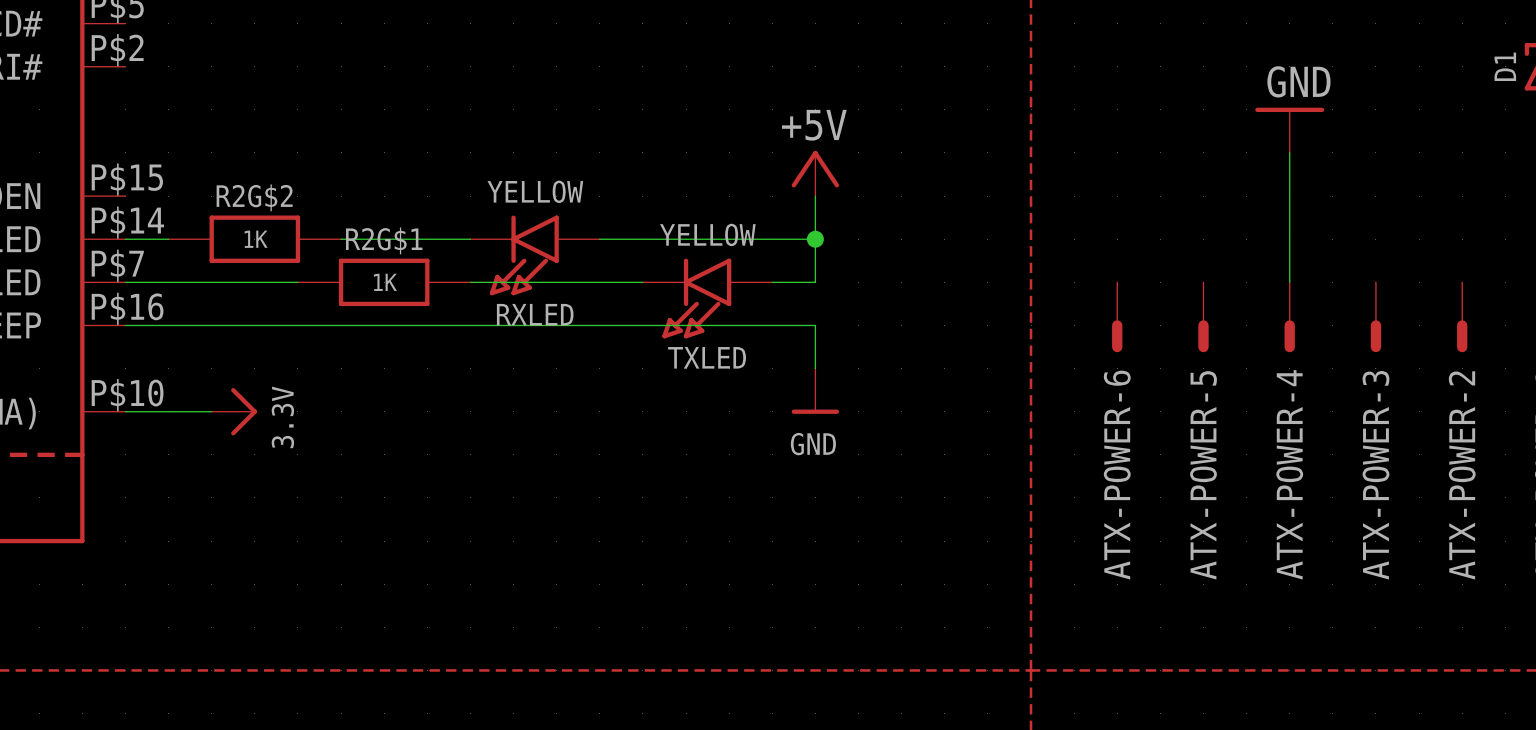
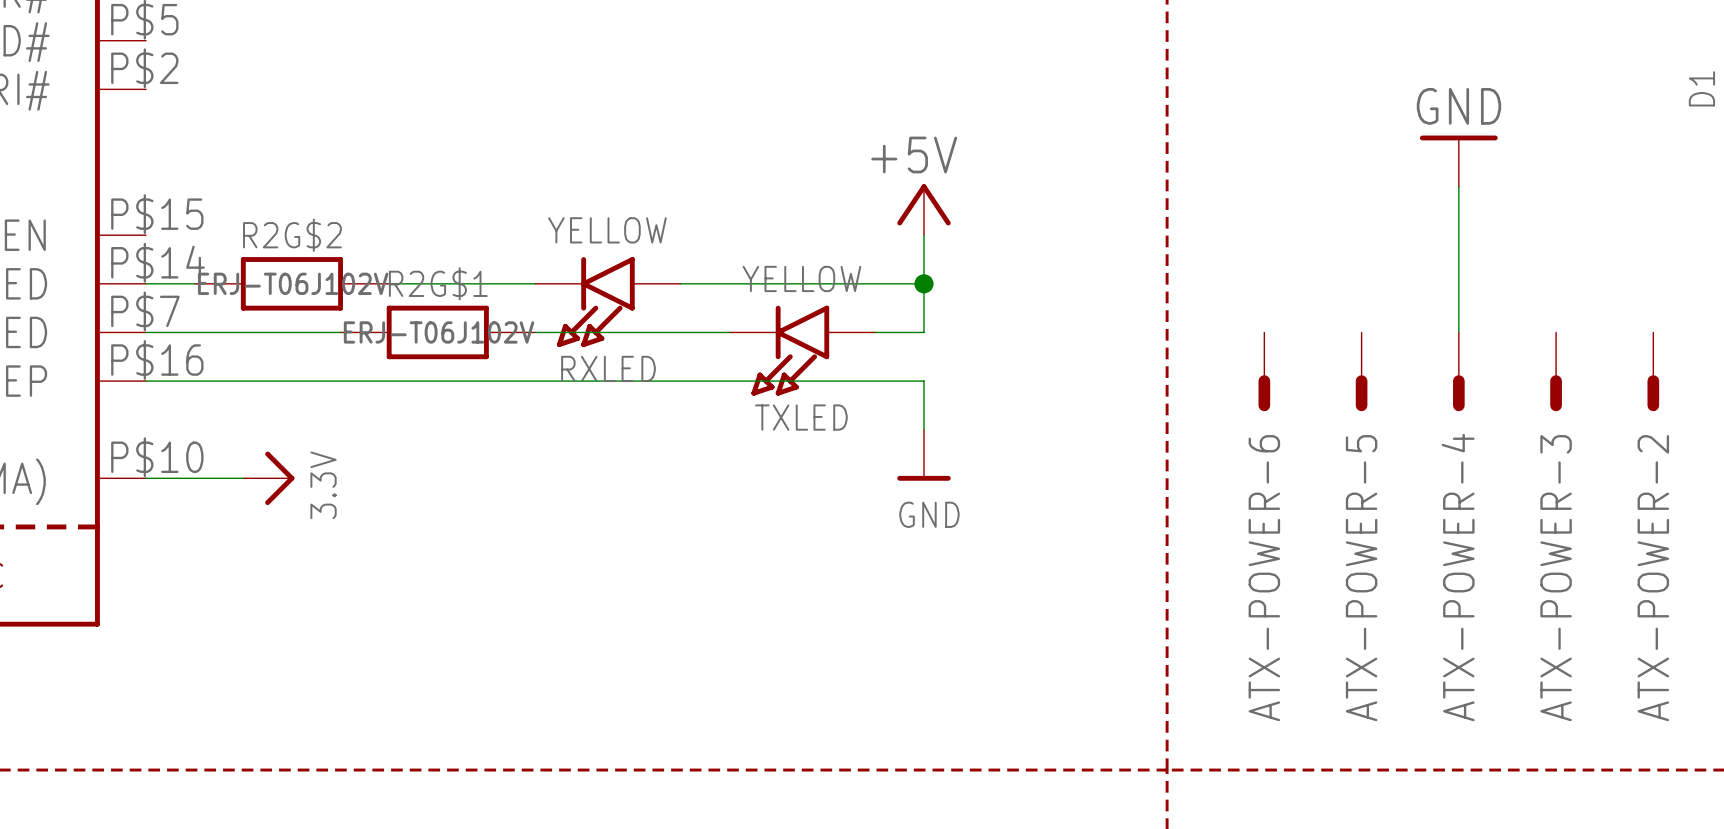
R2G$2 value: 1K (256, 239) -> ERJ-T06J102V (293, 283)
R2G$1 value: 1K (385, 282) -> ERJ-T06J102V (439, 332)

